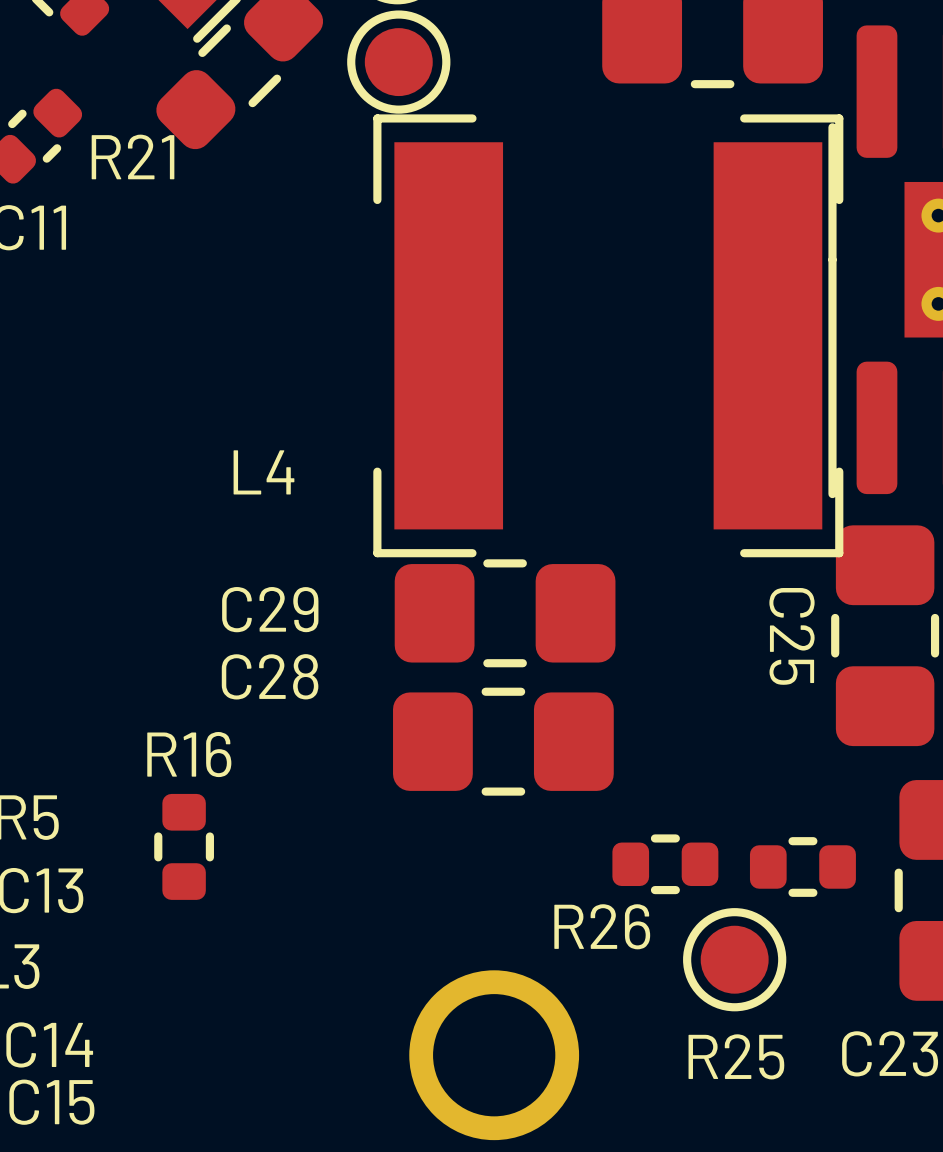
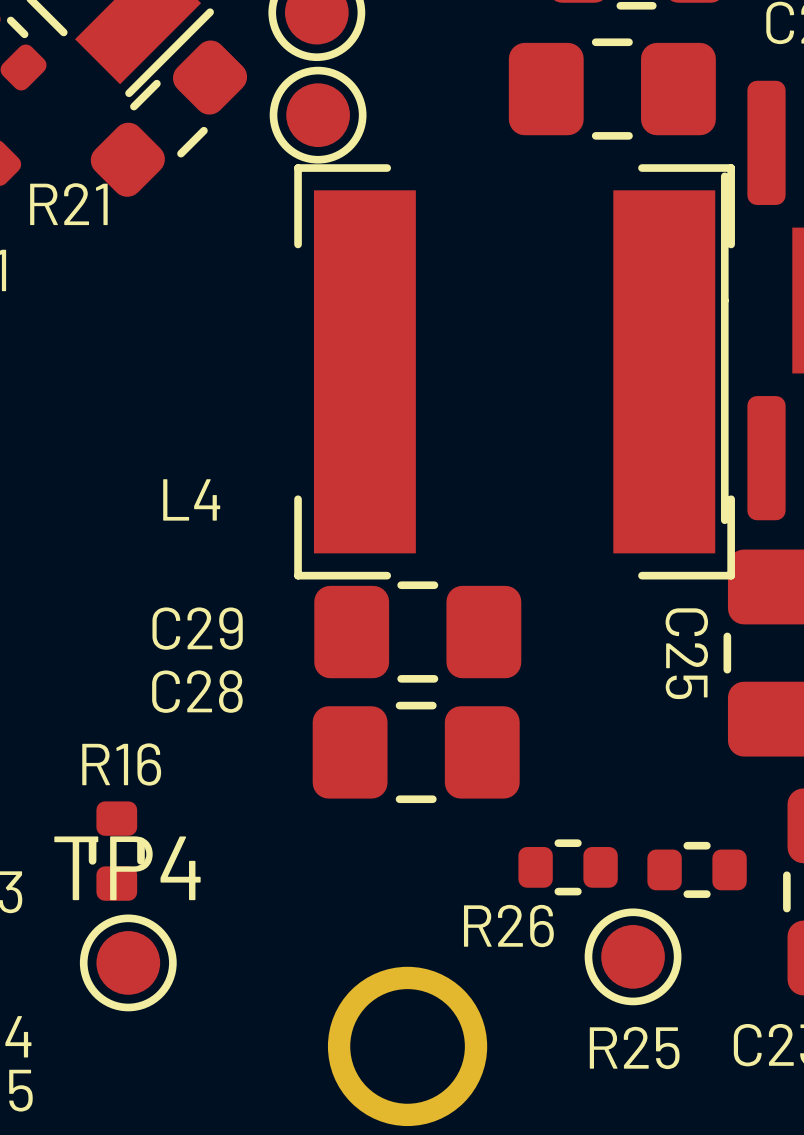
TP4: none -> (128, 962)

